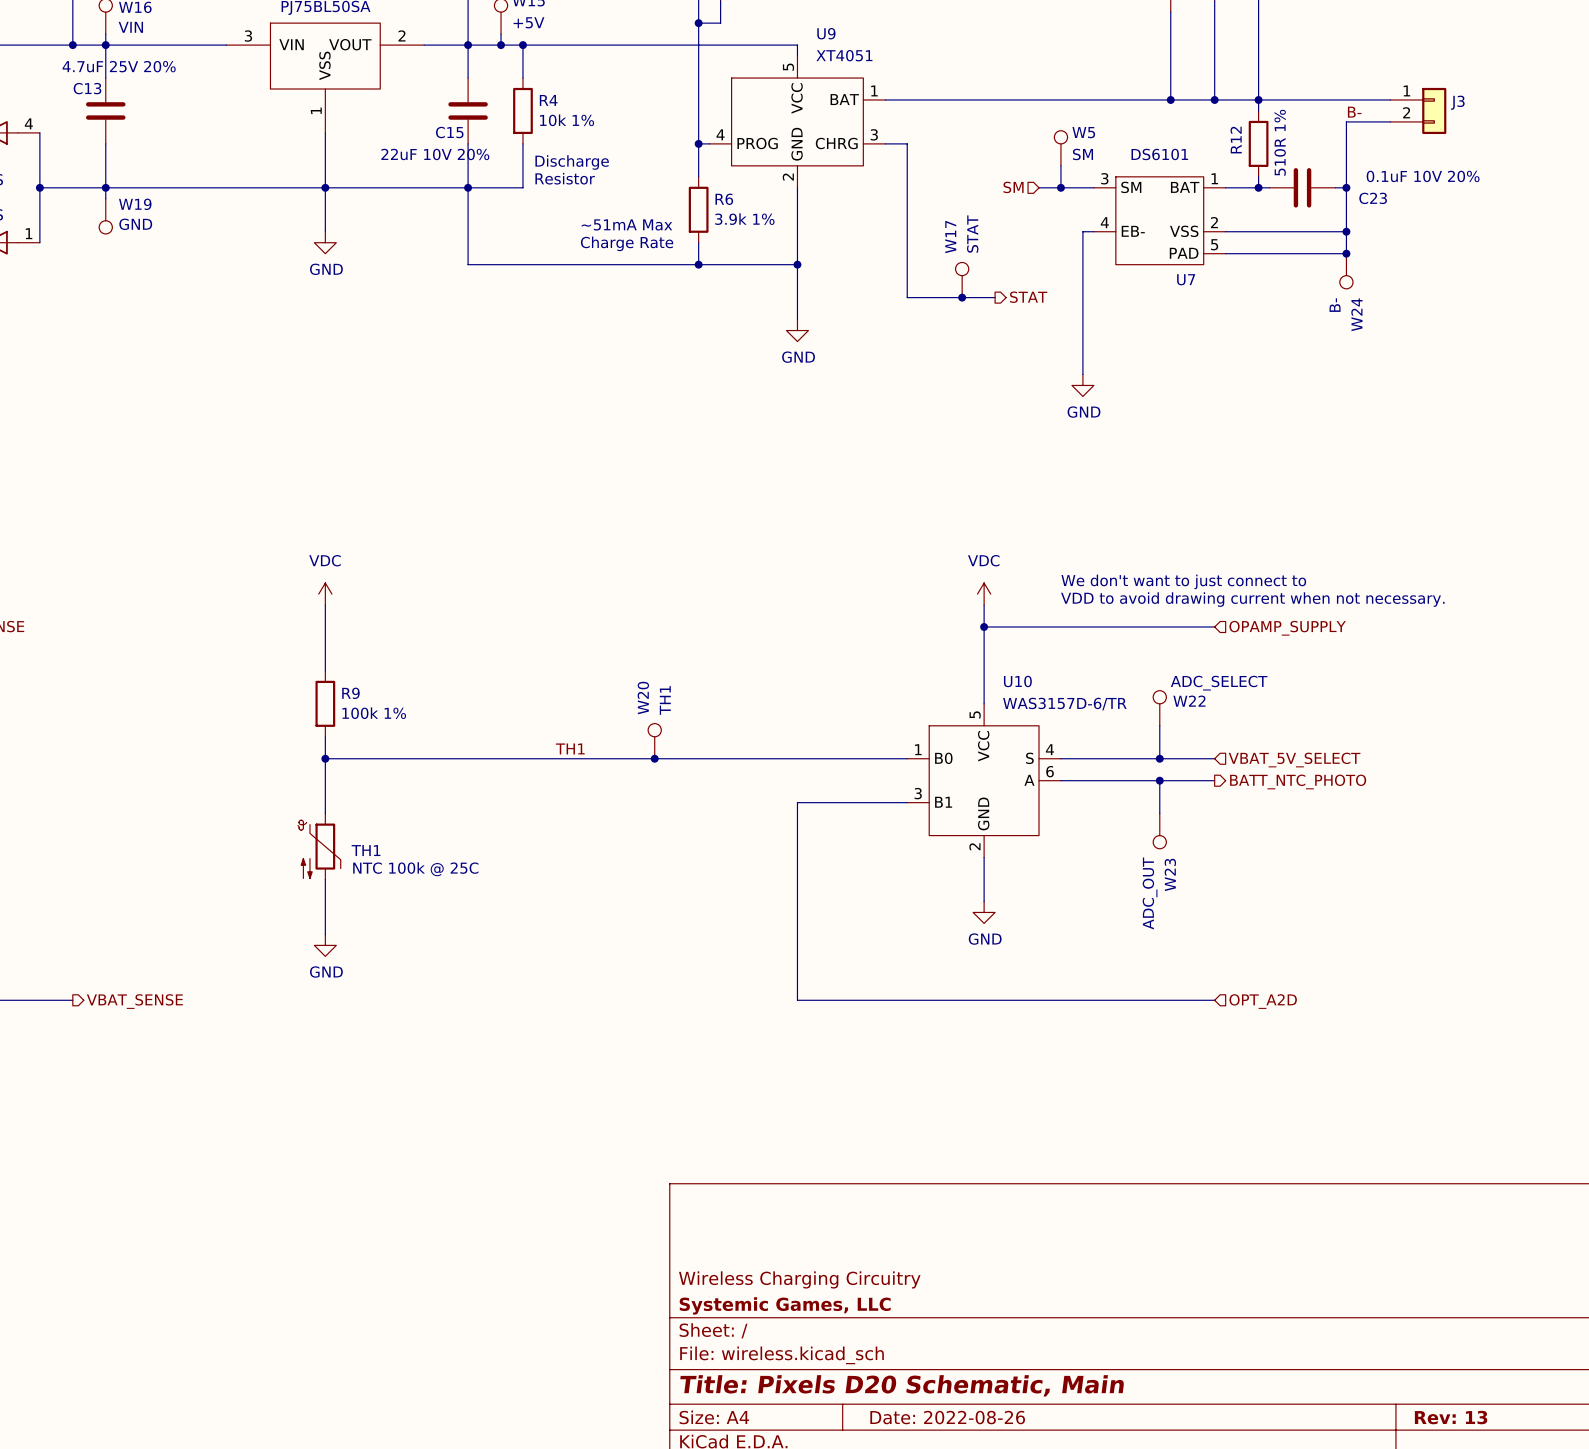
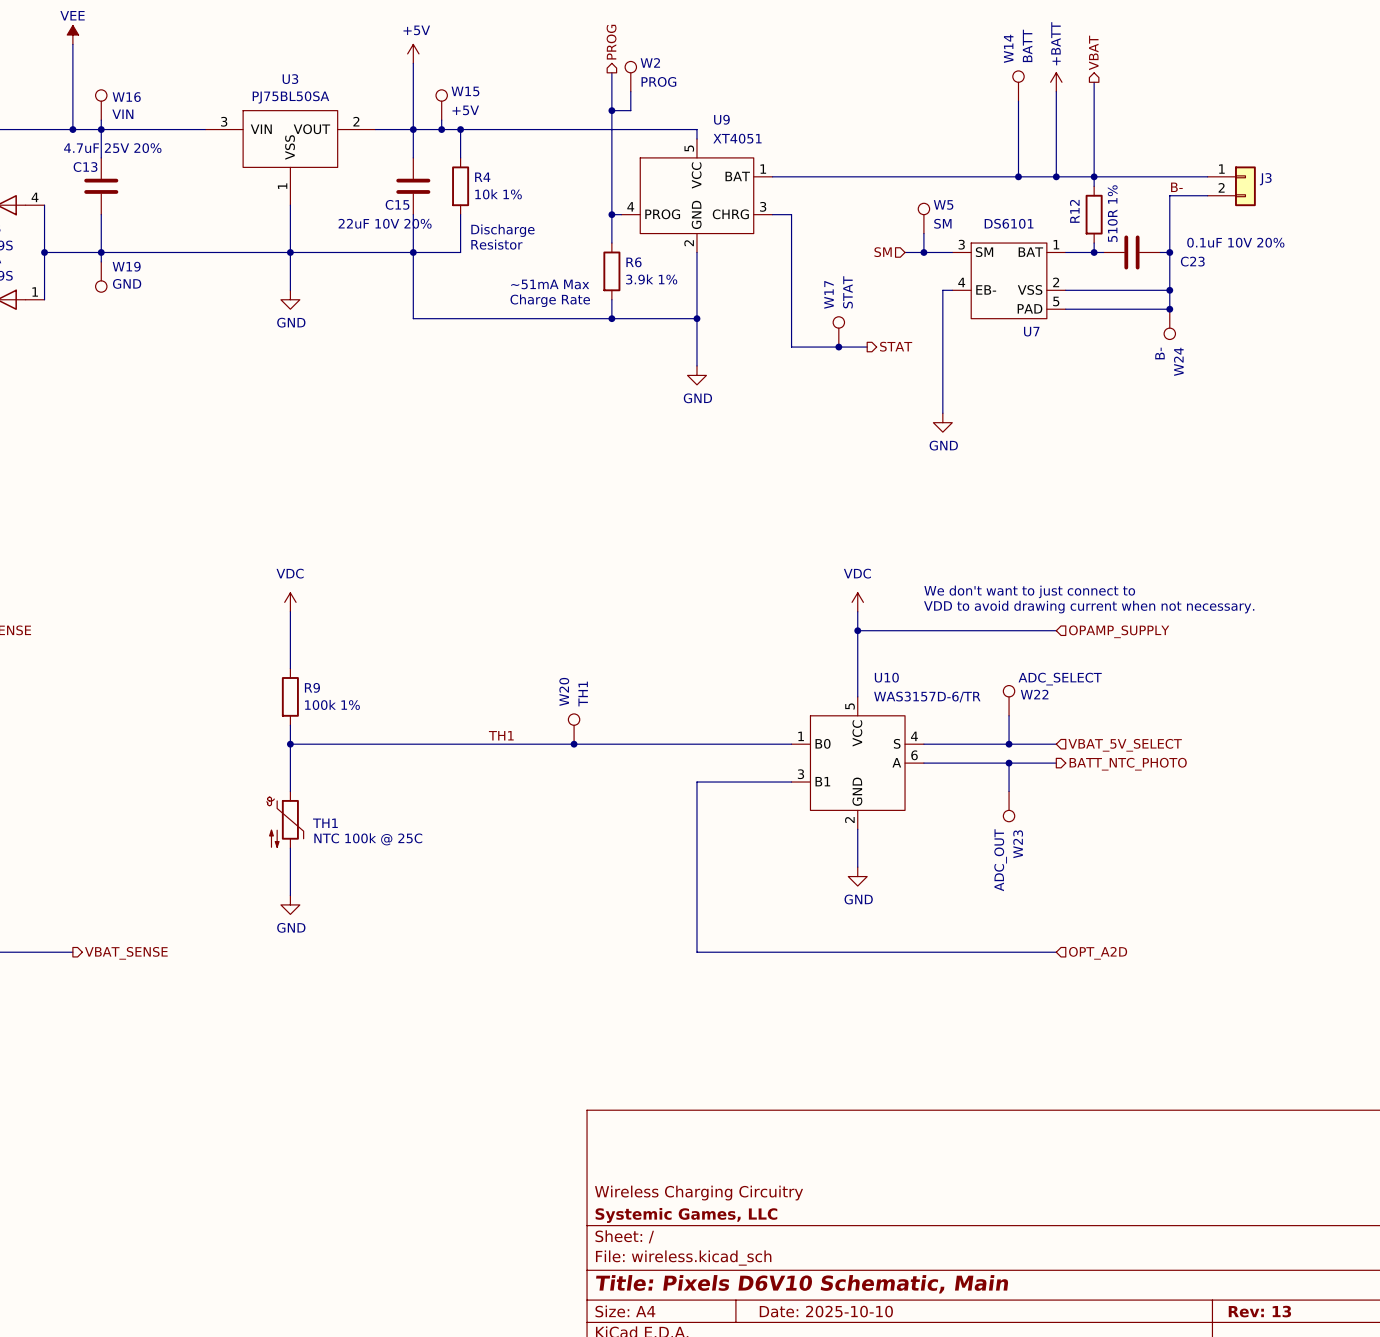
title block: Title: Pixels D20 Schematic, Main (902, 1385) -> Title: Pixels D6V10 Schematic, Main (802, 1284)
title block: Date: 2022-08-26 (947, 1417) -> Date: 2025-10-10 (826, 1311)

